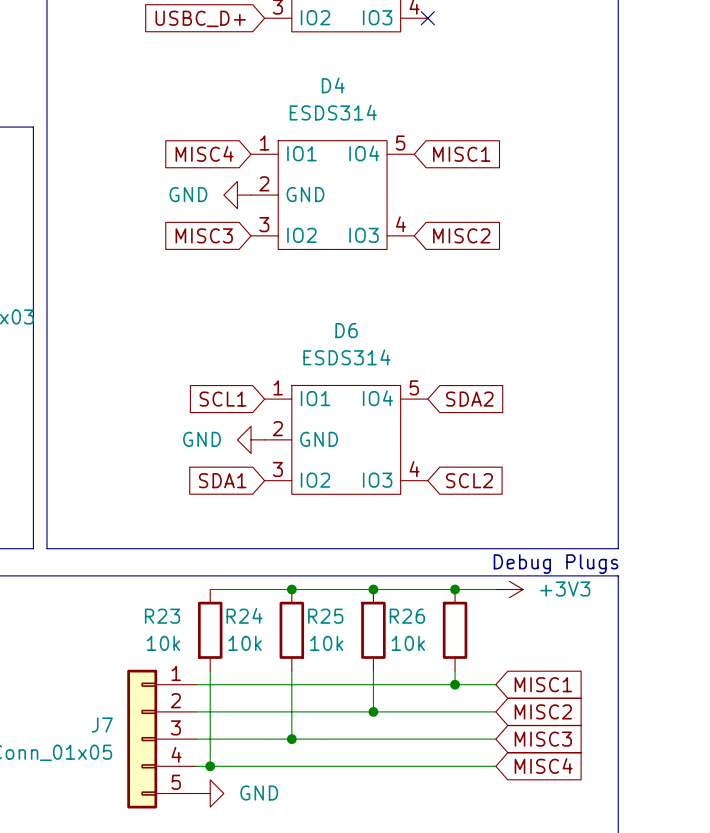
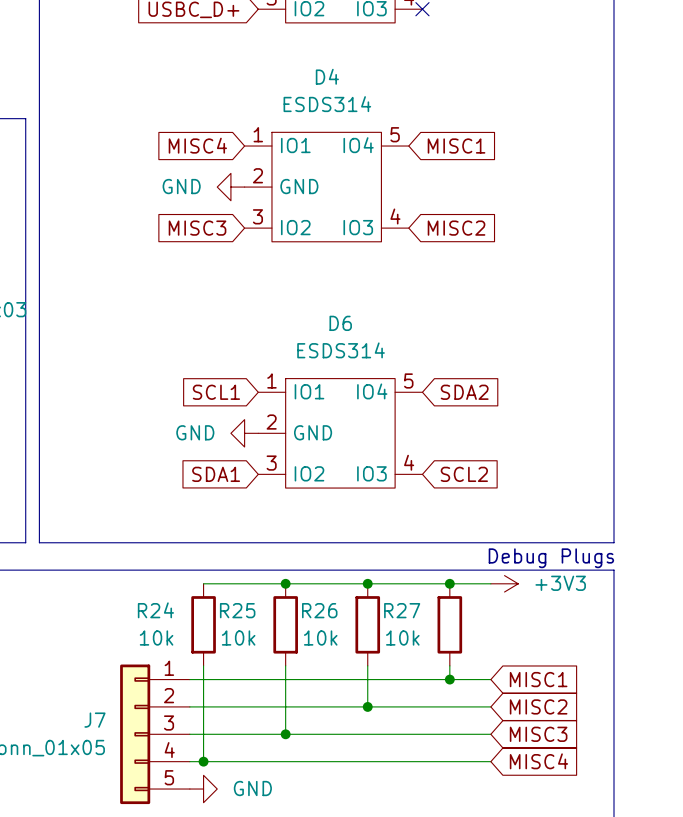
R24 name: R24 (244, 615) -> R25 (237, 610)
R23 name: R23 (162, 616) -> R24 (155, 610)
R25 name: R25 (325, 616) -> R26 (319, 610)
R26 name: R26 (407, 616) -> R27 (402, 610)

